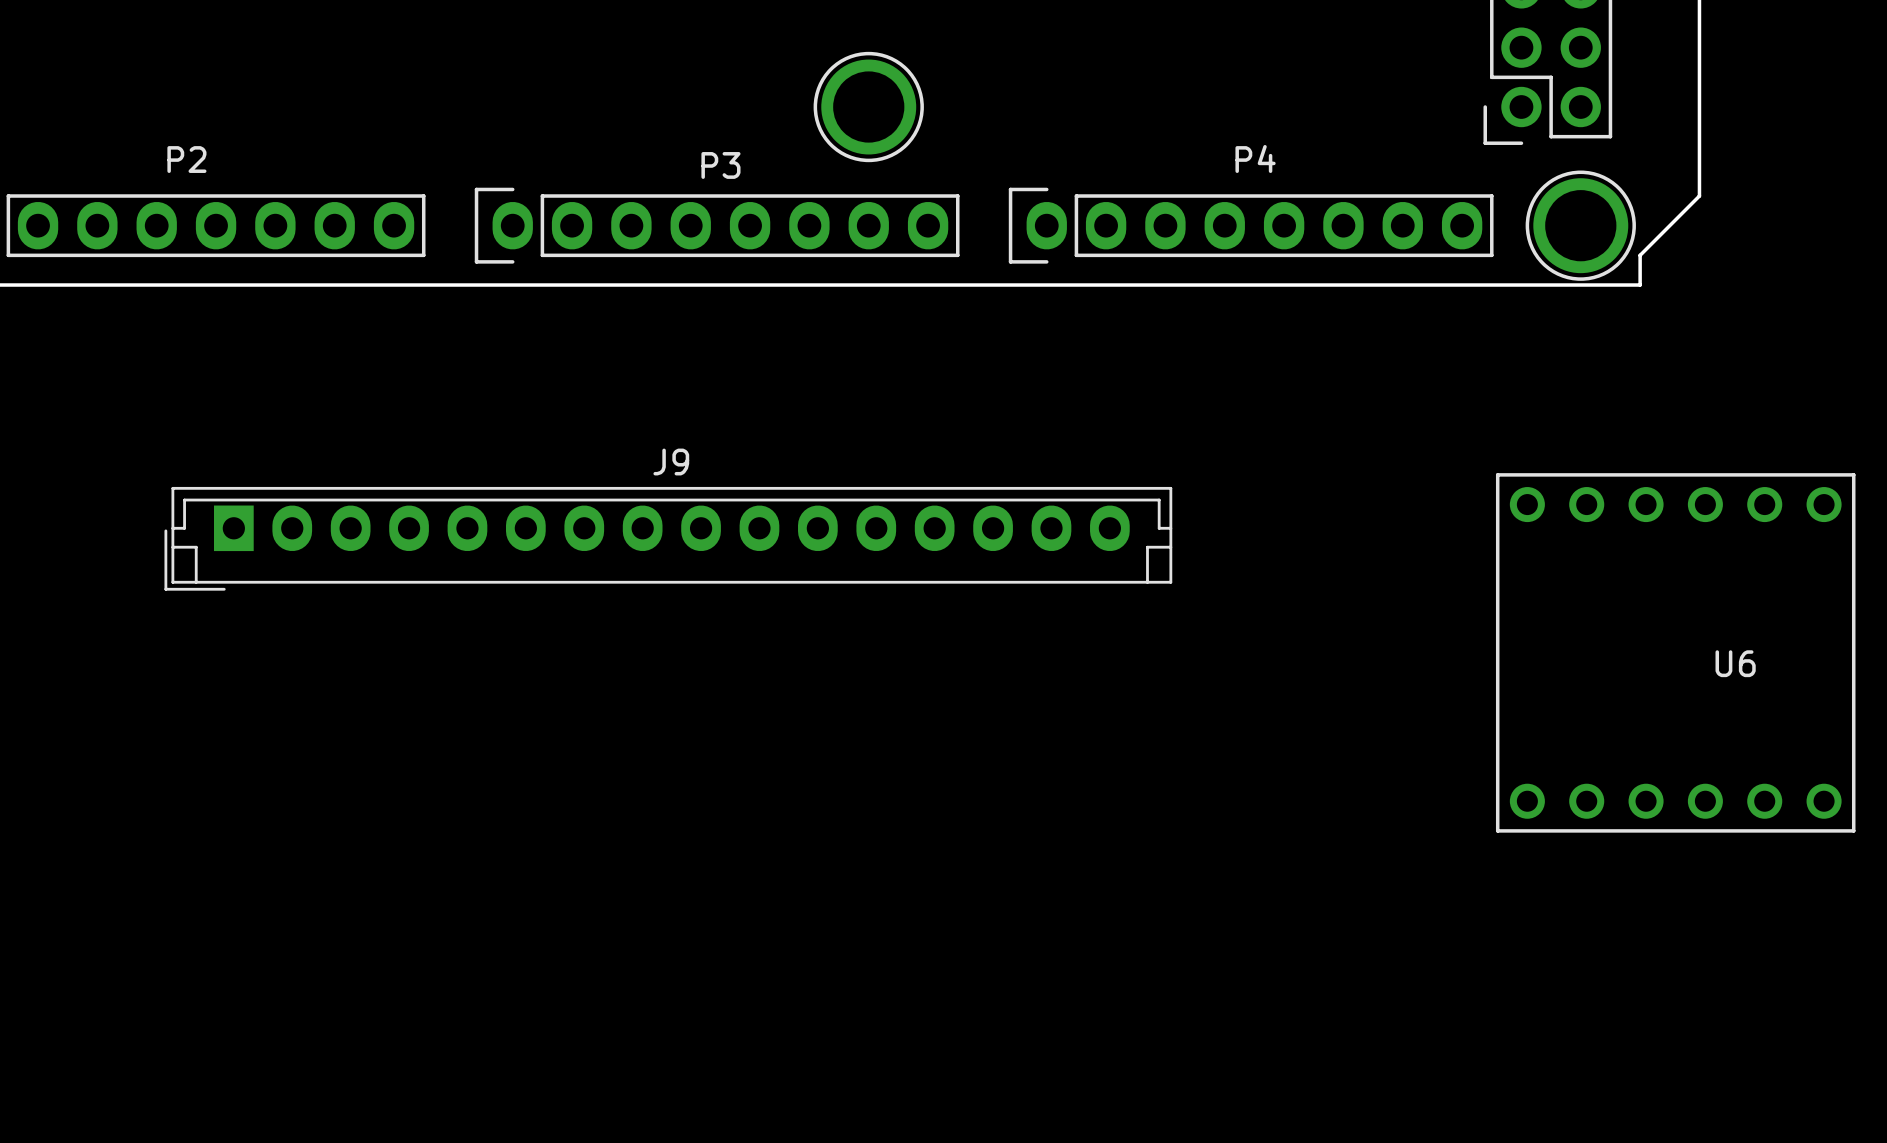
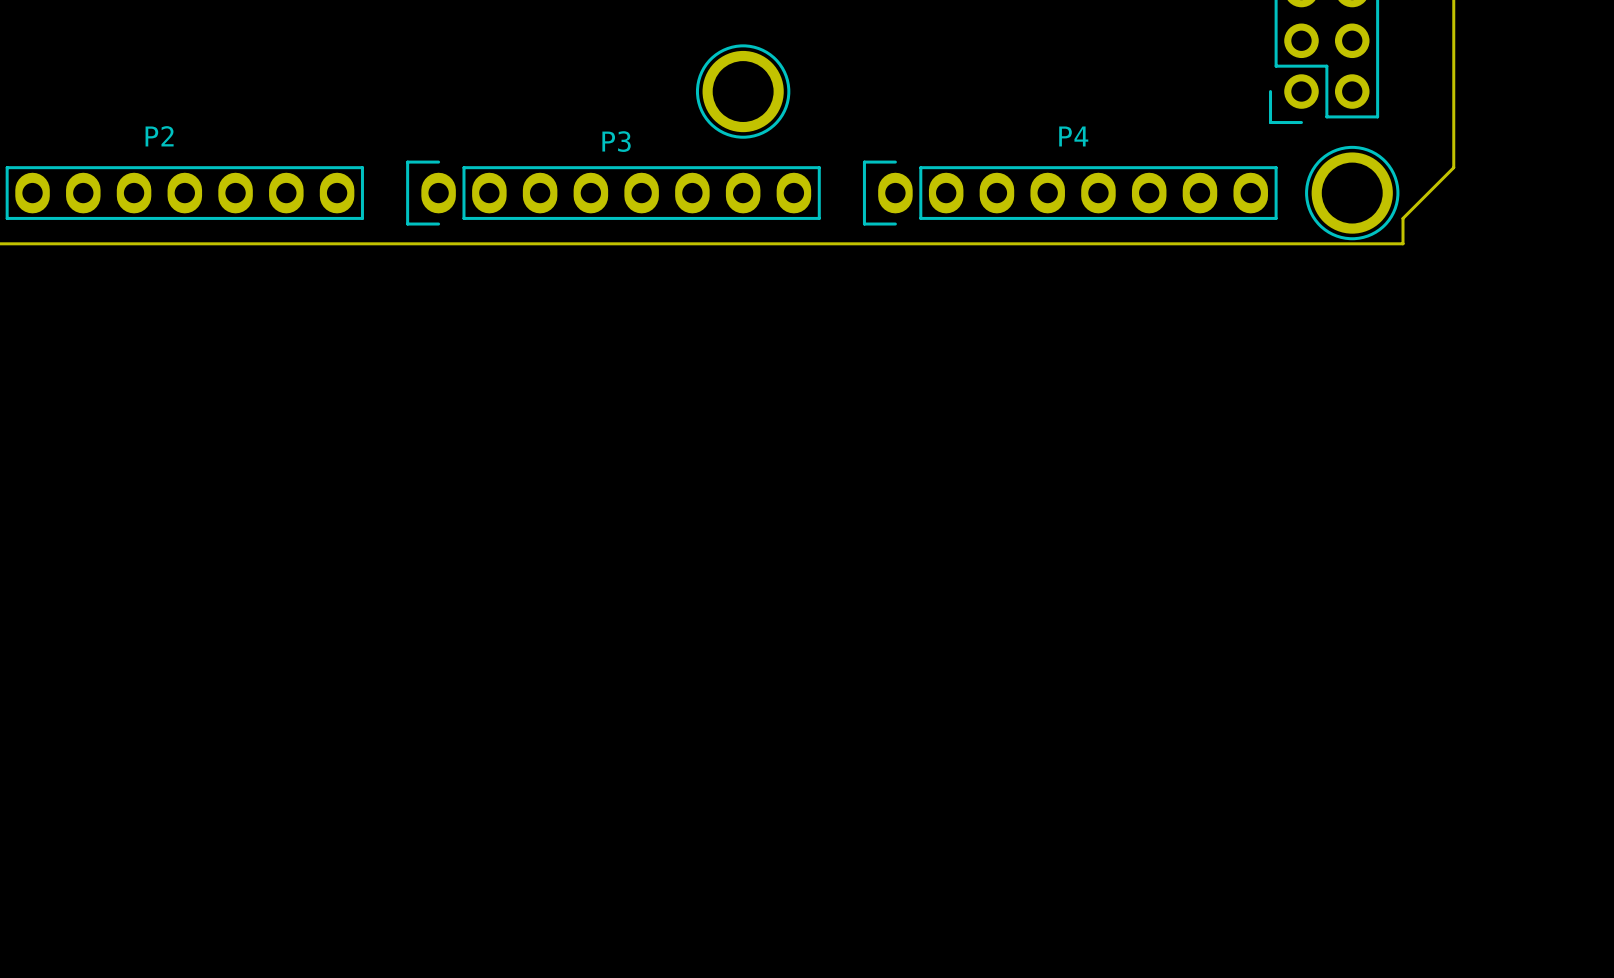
J9: (668, 538) -> none
U6: (1675, 652) -> none

